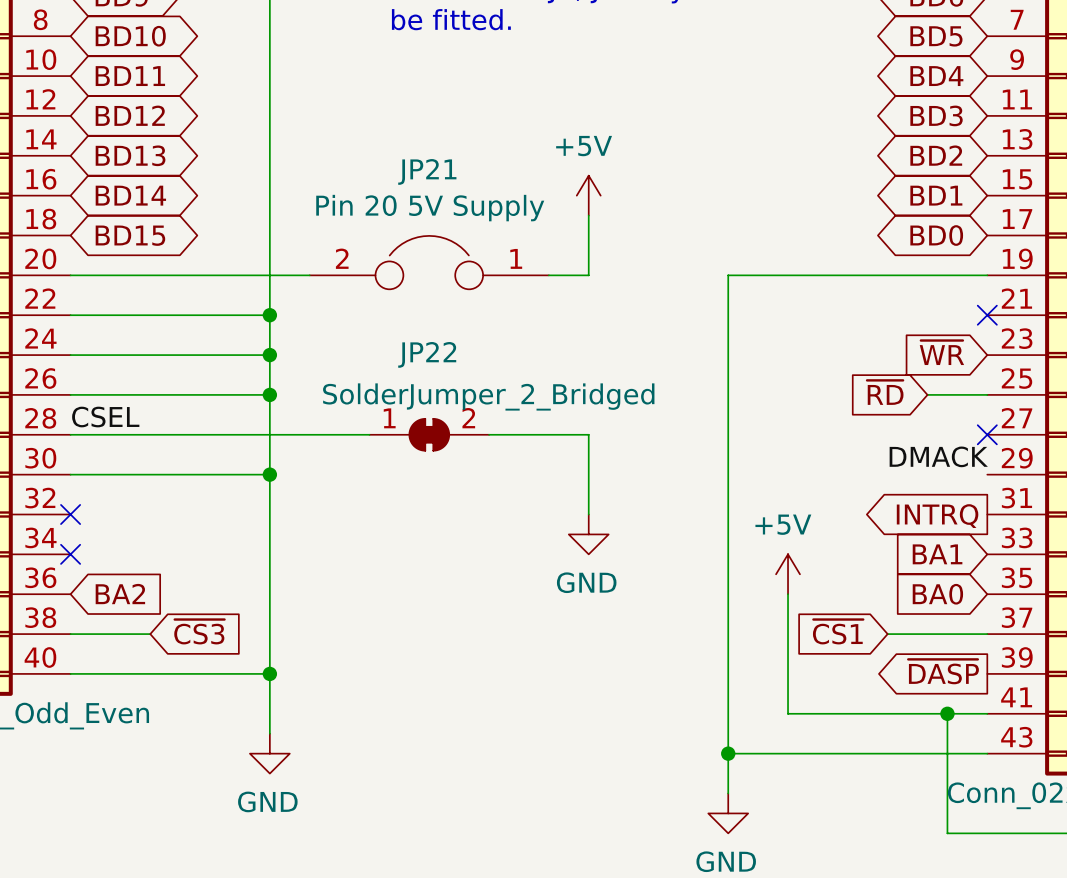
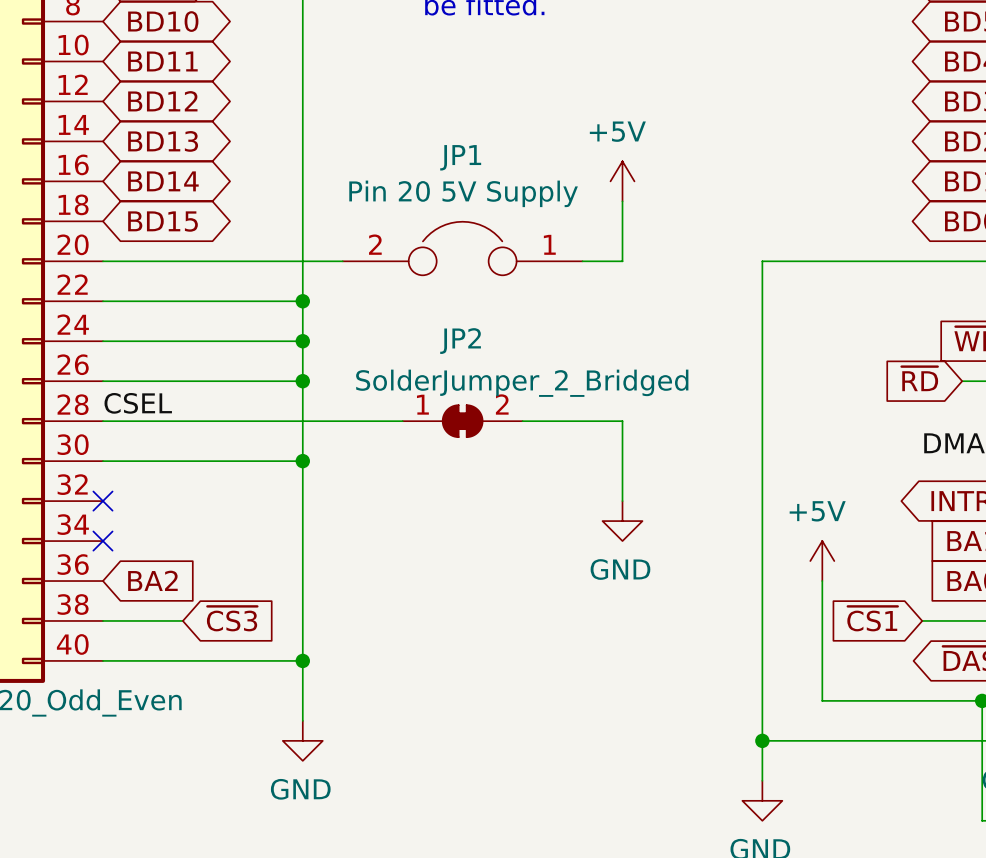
JP21 name: JP21 (427, 171) -> JP1 (460, 157)
JP22 name: JP22 (427, 354) -> JP2 (460, 341)

